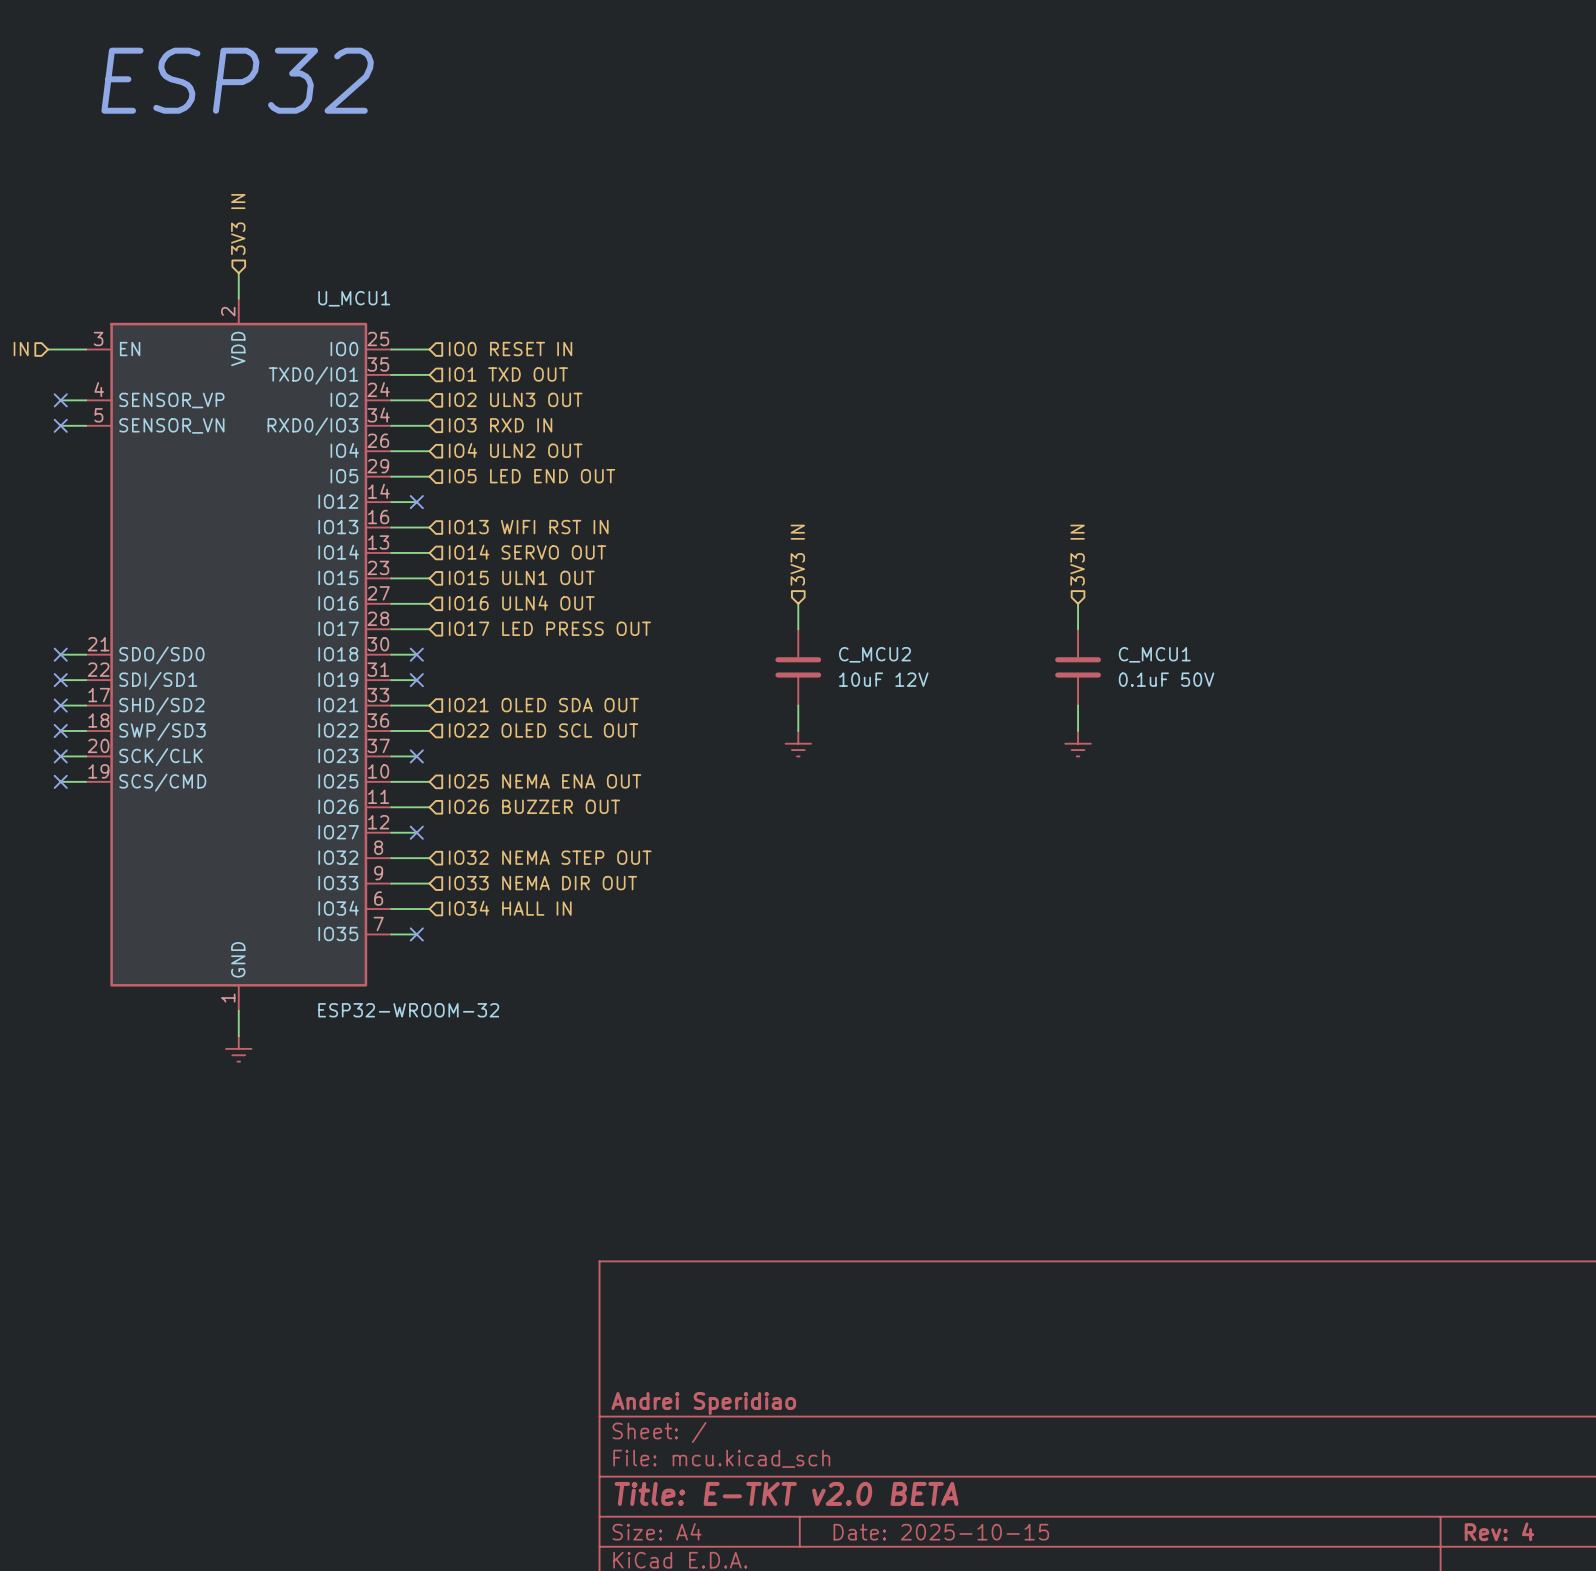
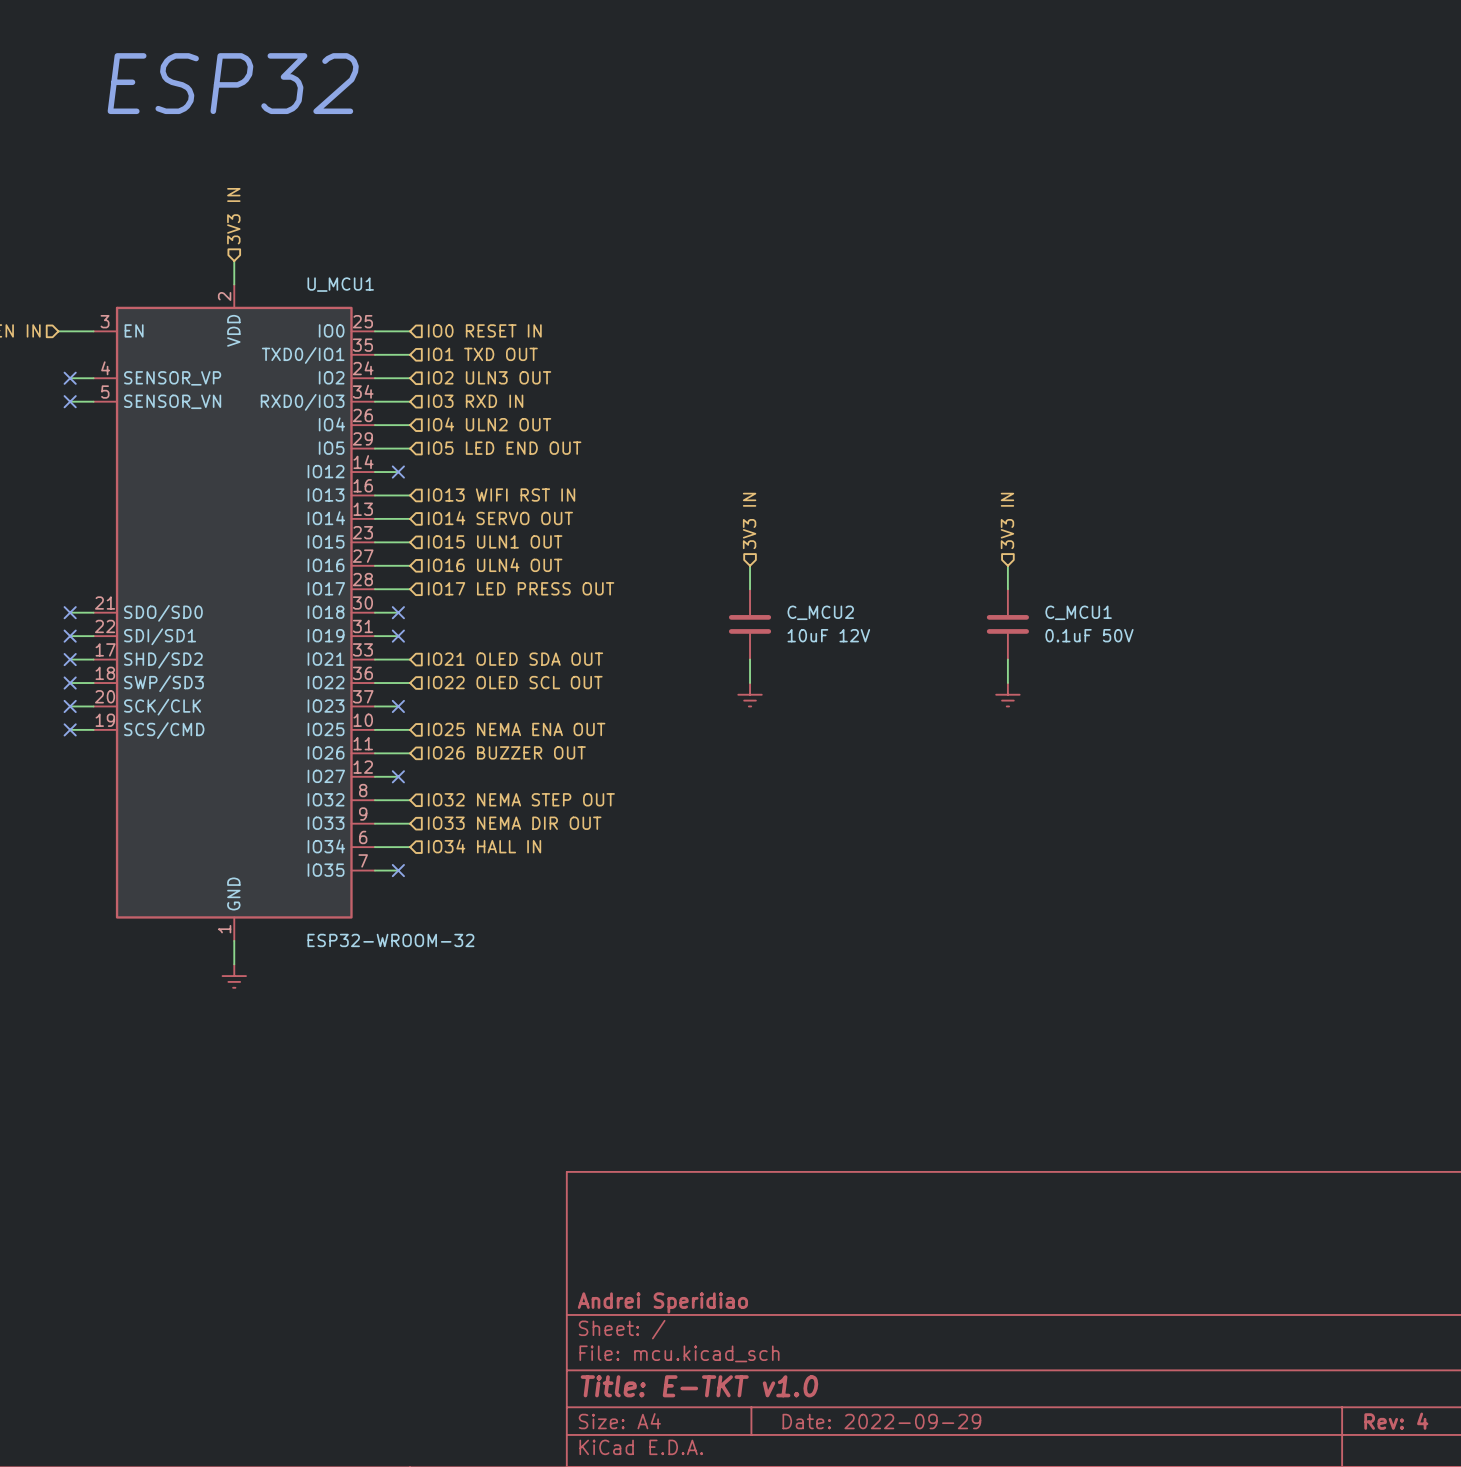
title block: Title: E-TKT v2.0 BETA (786, 1493) -> Title: E-TKT v1.0 (699, 1386)
title block: Date: 2025-10-15 (941, 1532) -> Date: 2022-09-29 (881, 1421)

